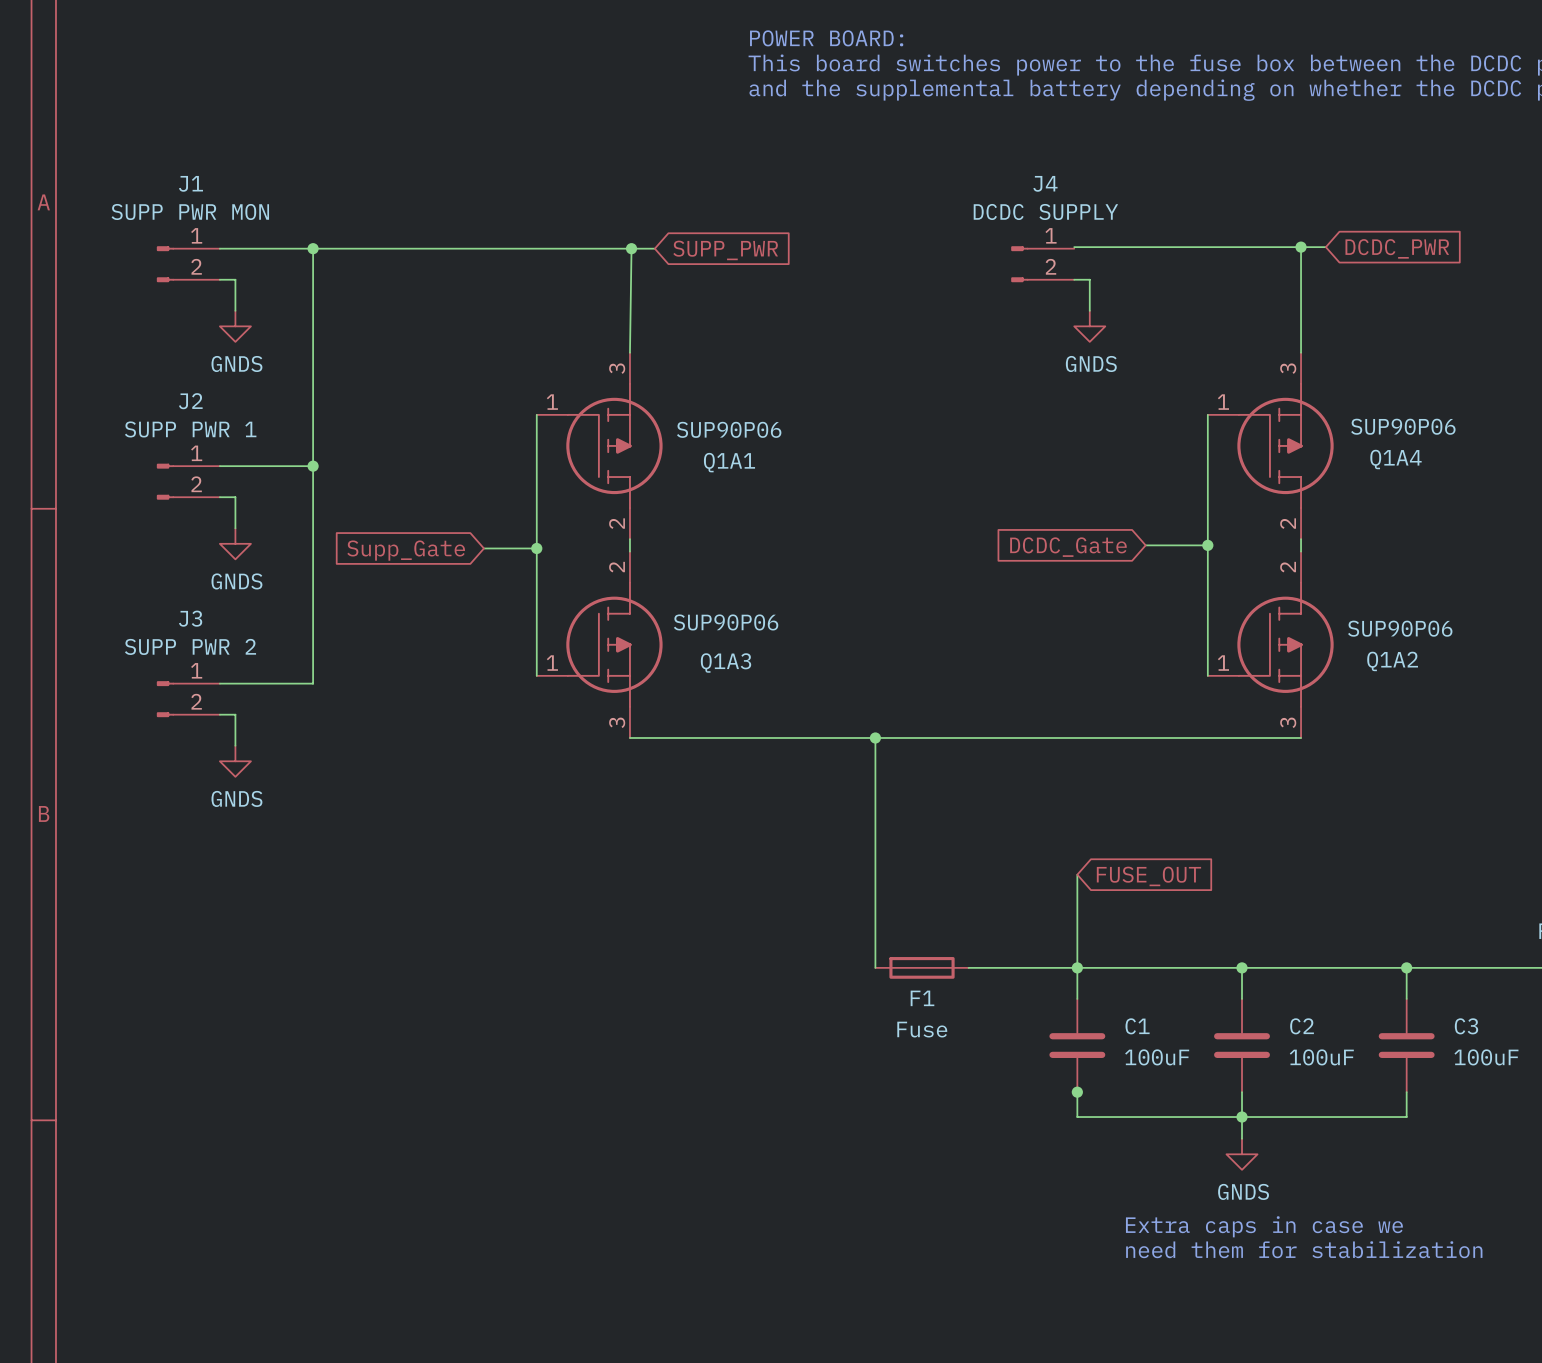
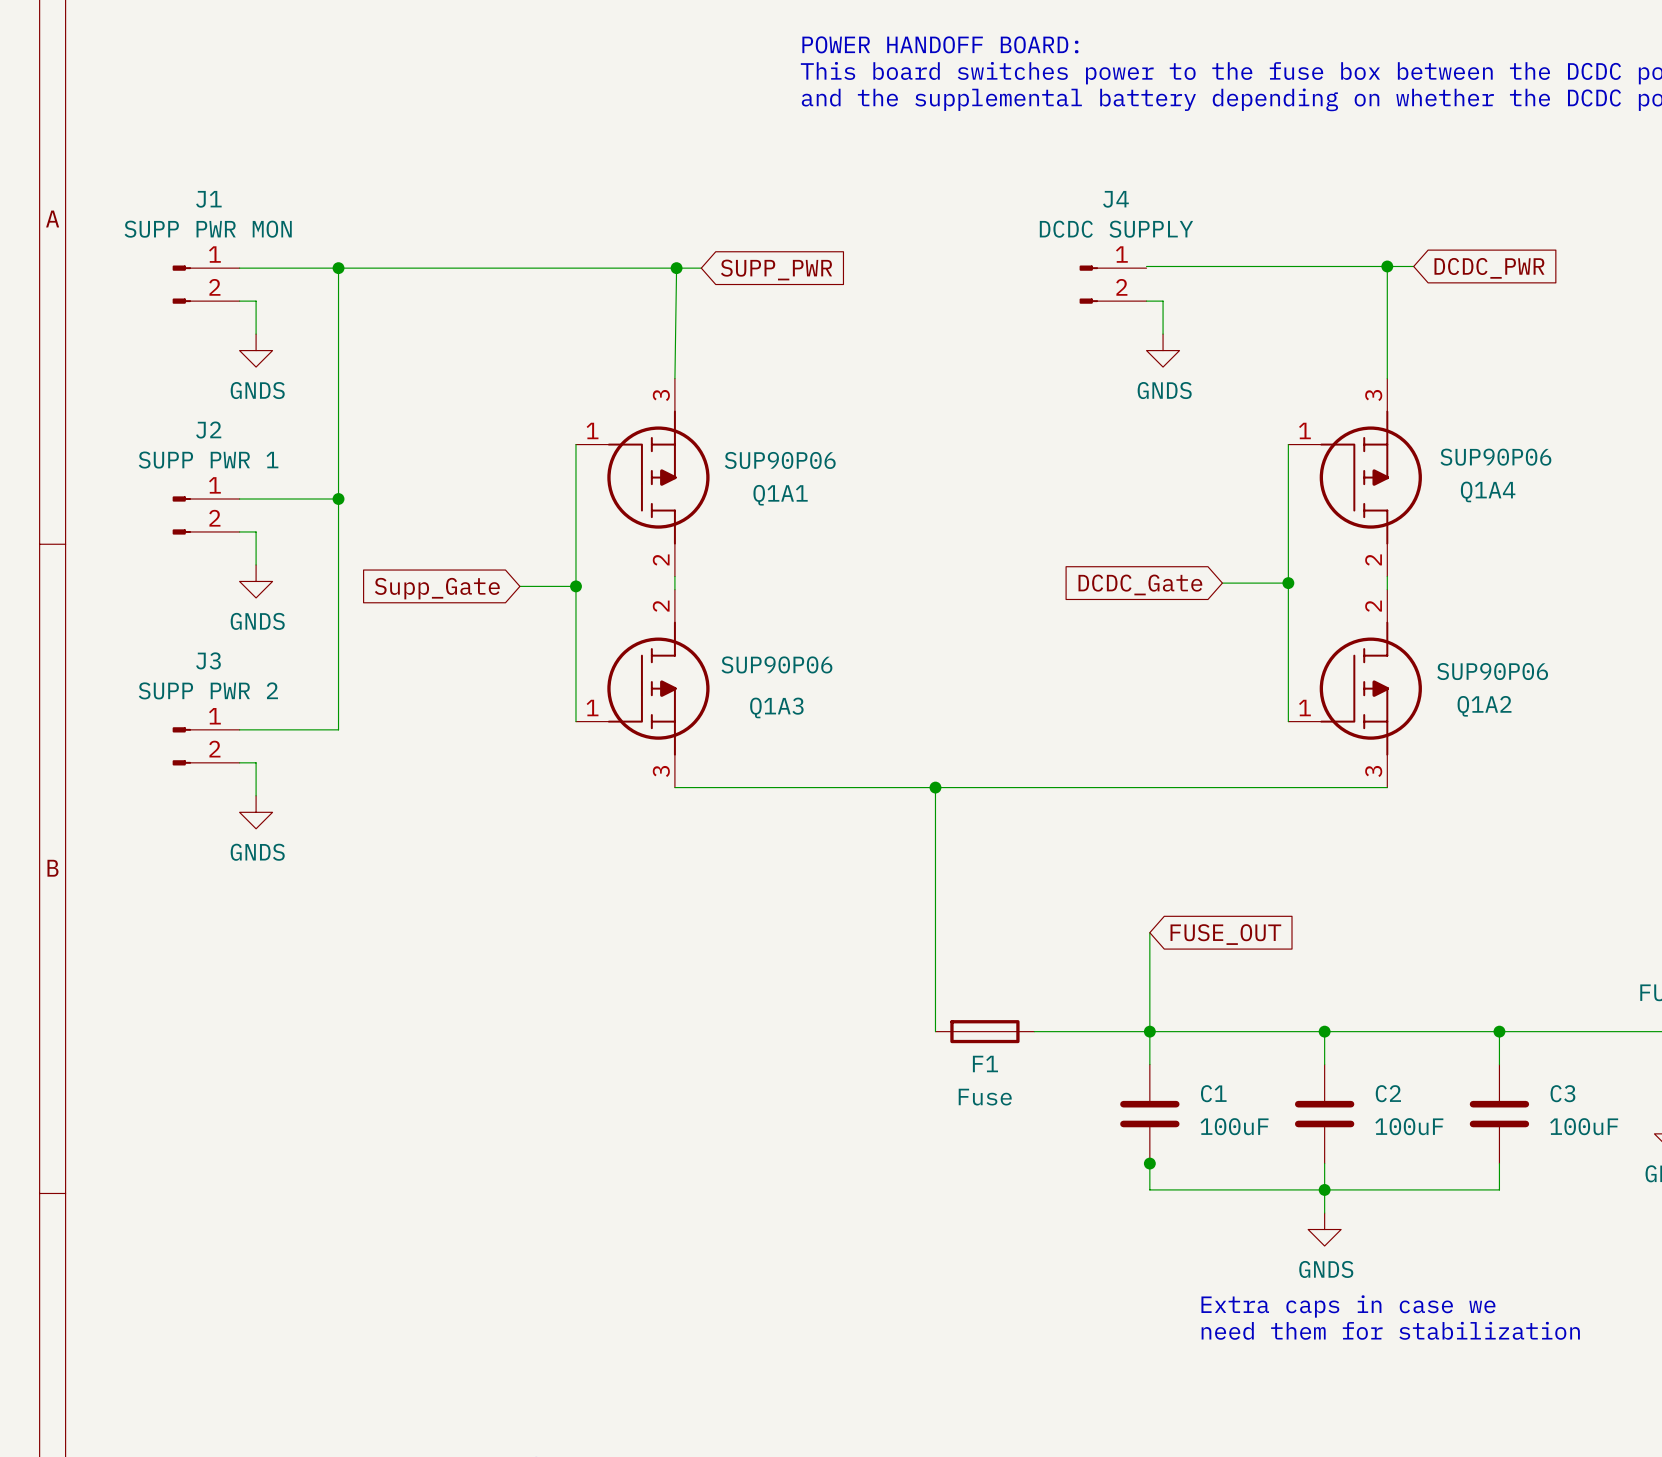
text: POWER BOARD: (826, 38) -> POWER HANDOFF BOARD: (940, 44)

